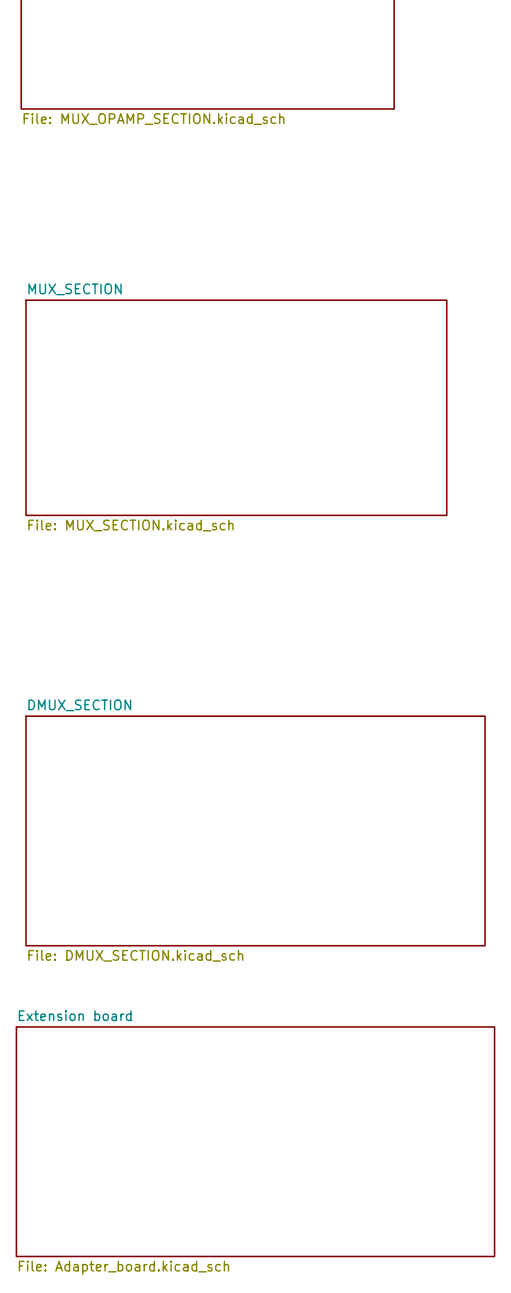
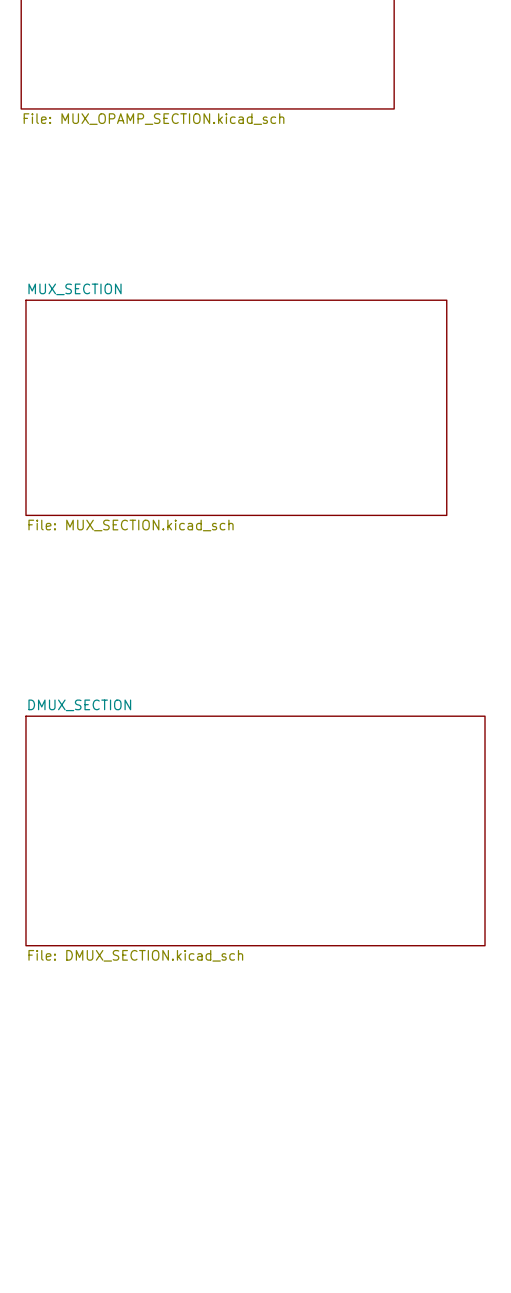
sheet Extension board: File: Adapter_board.kicad_sch (255, 1141) -> none

